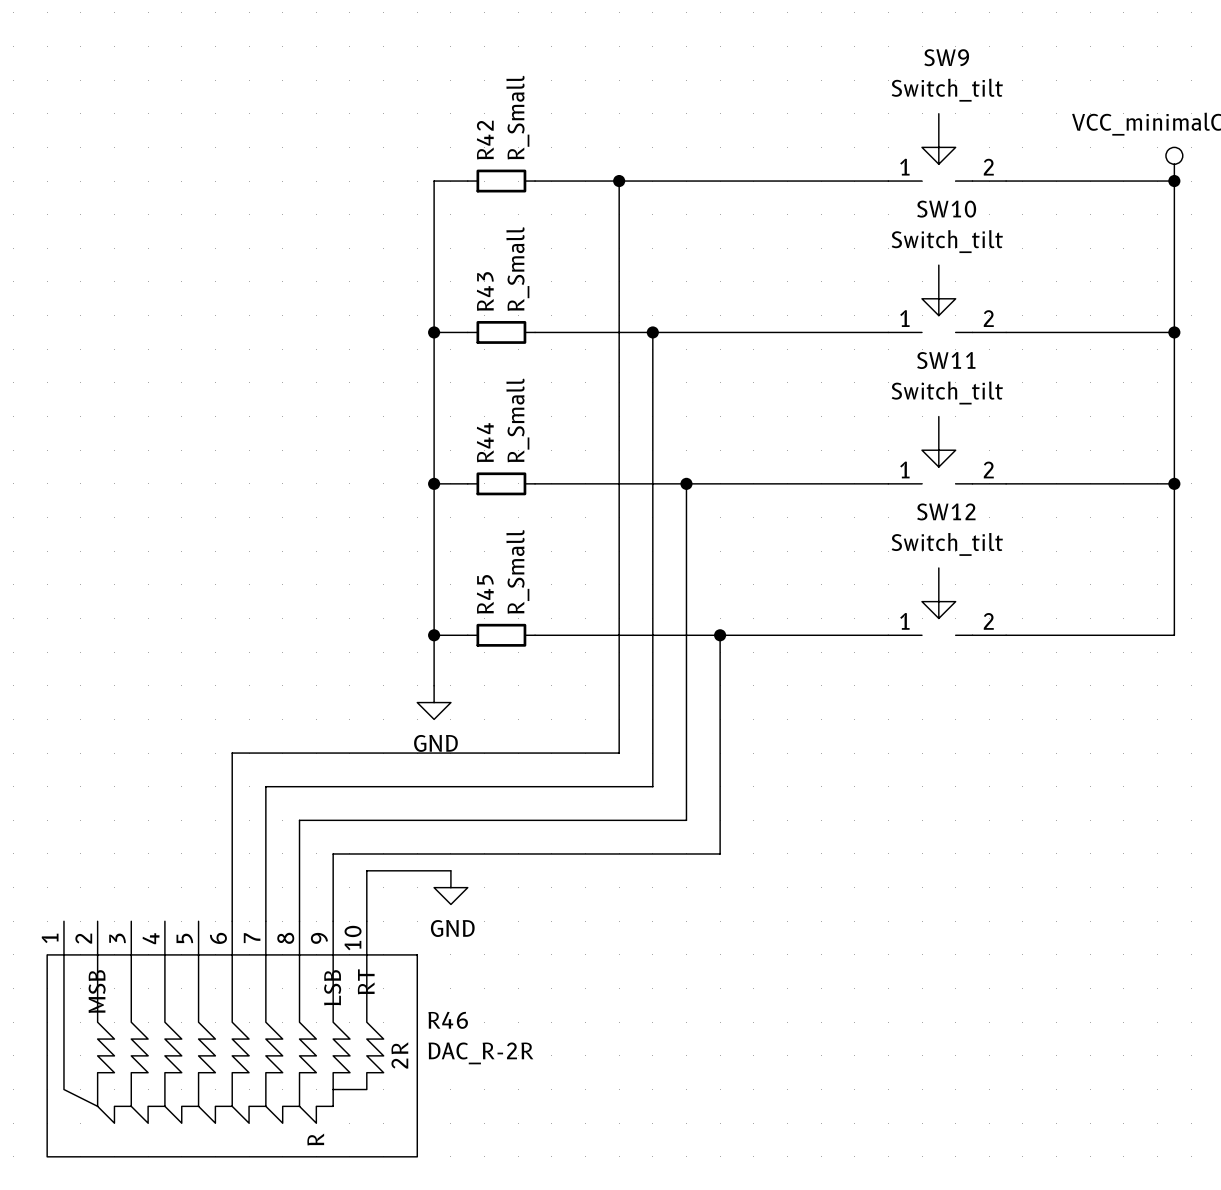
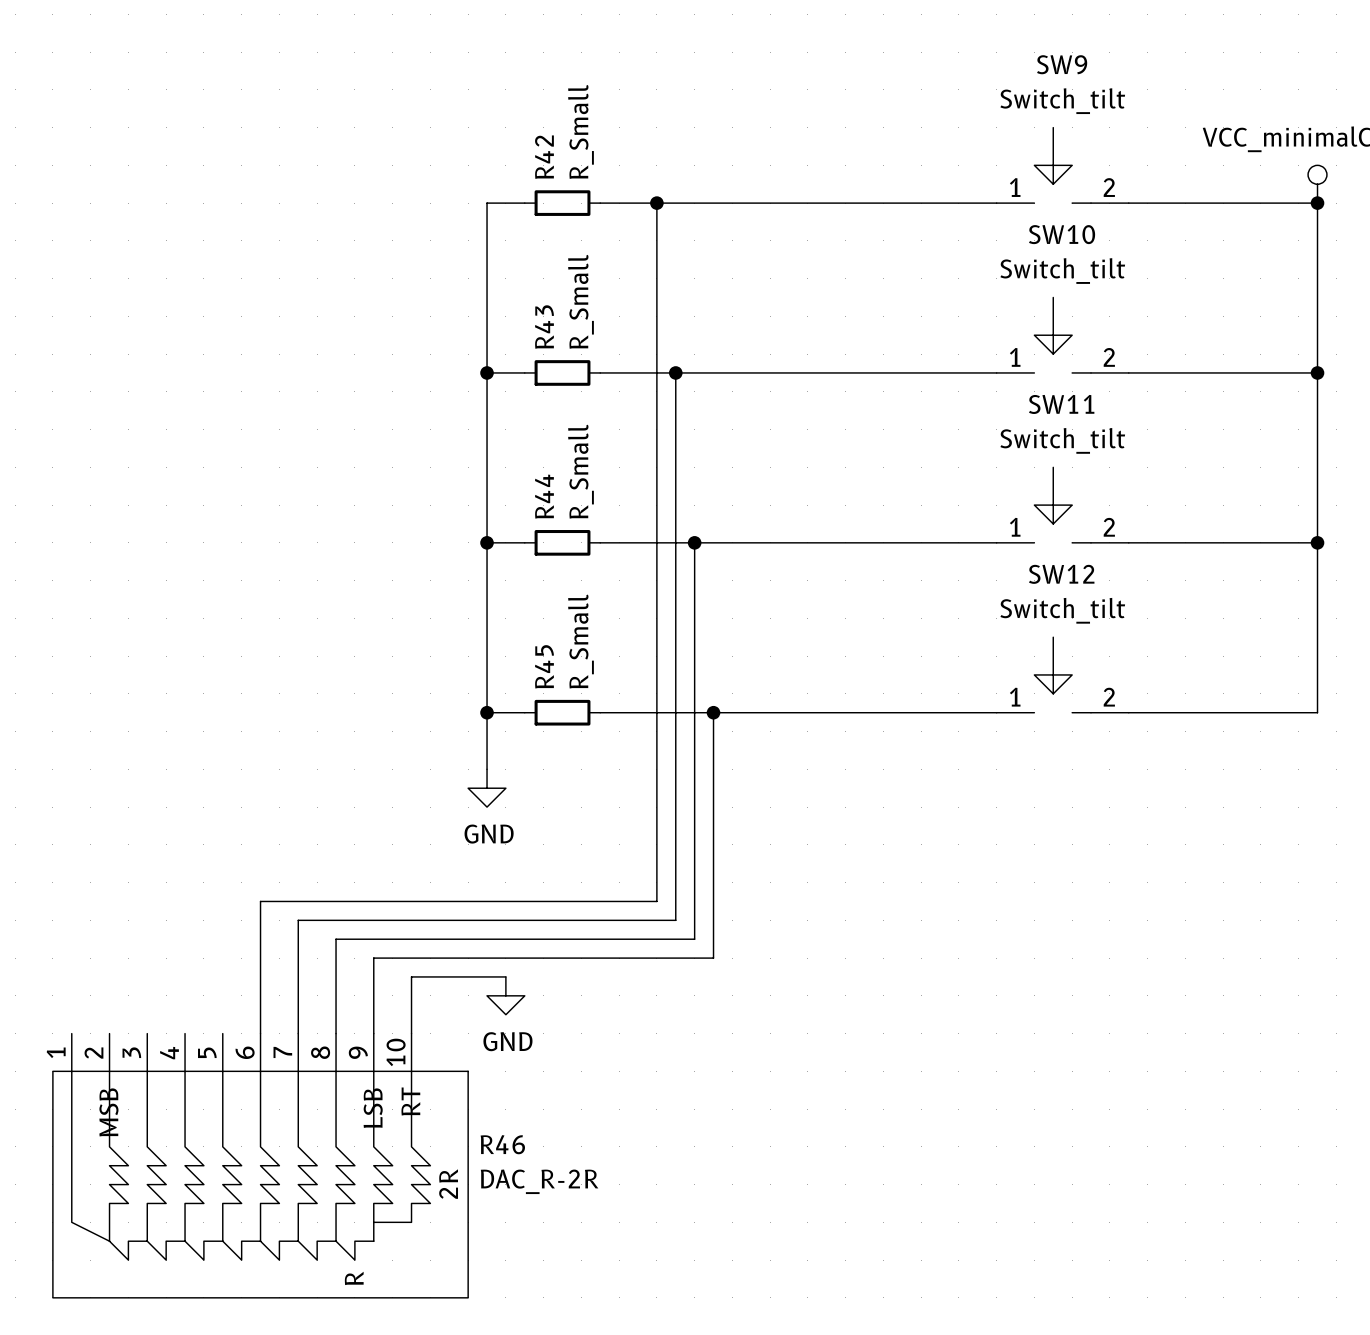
wire: none -> (656, 203) (656, 901) (260, 901)
wire: (619, 181) (619, 483) -> none
junction position: (619, 181) -> (656, 203)
wire: (652, 332) (652, 786) (265, 786) (265, 820) -> none
junction position: (652, 332) -> (675, 372)
wire: (686, 483) (686, 820) (602, 820) -> (675, 372) (675, 920)
junction position: (686, 483) -> (694, 542)
junction: none -> (713, 712)
wire: (720, 635) (720, 853) (635, 853) -> (713, 712) (713, 958)
junction: (720, 635) -> none
wire: (619, 753) (232, 753) (232, 803) -> (694, 844) (694, 939) (336, 939)
wire: (299, 820) (299, 837) -> (336, 920) (298, 920)

